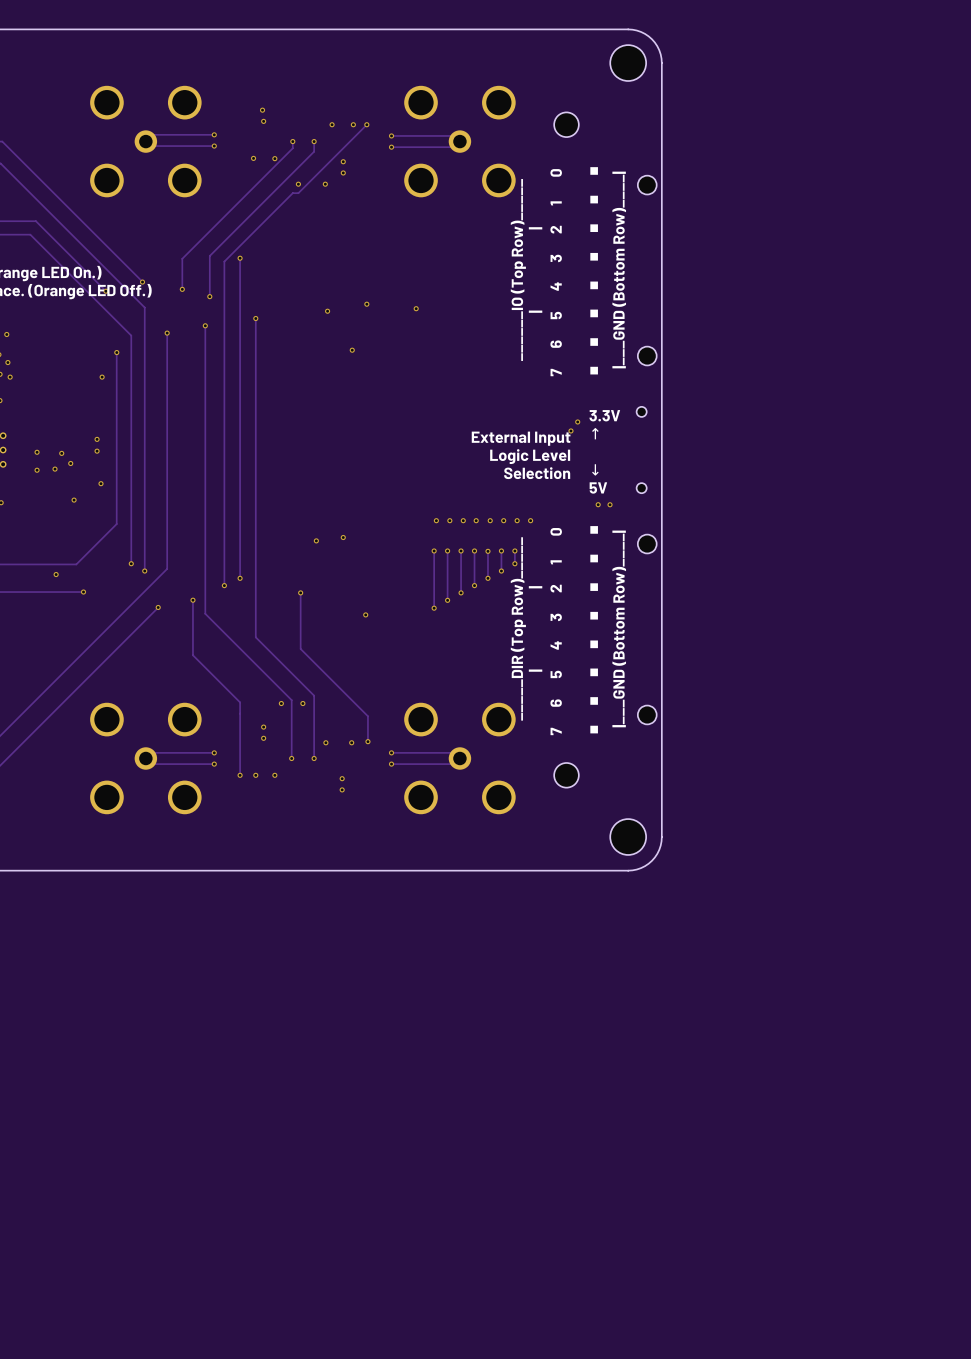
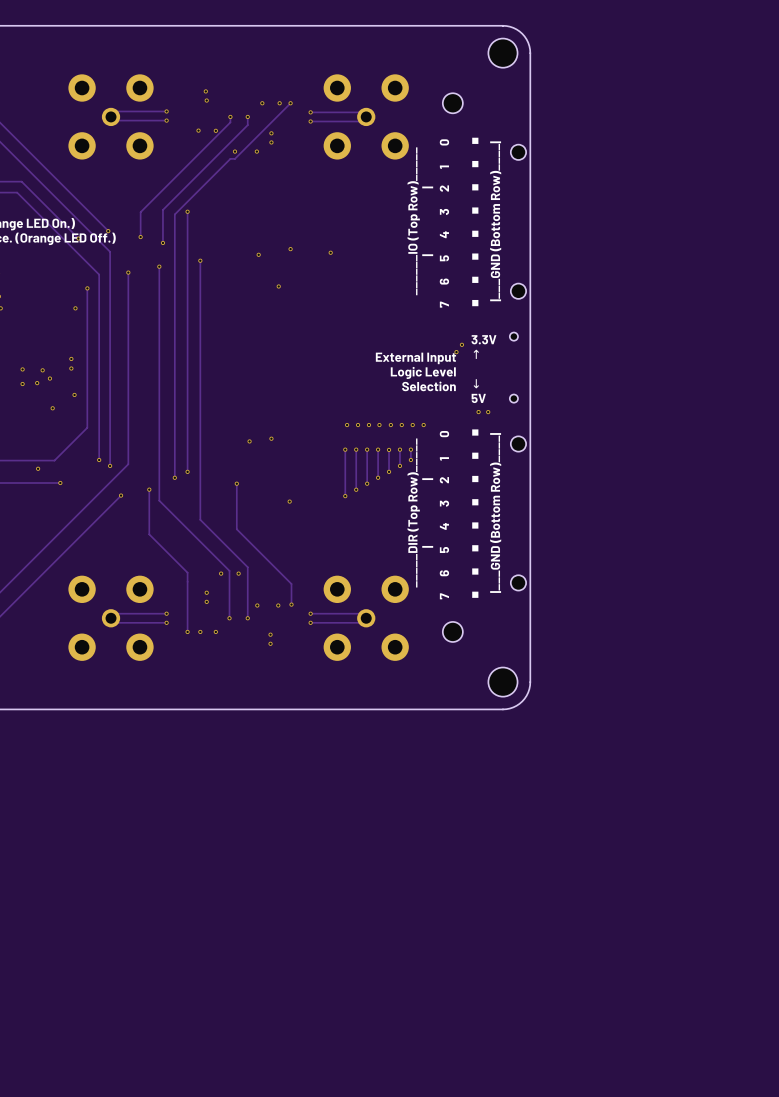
part footprint: [90, 85, 202, 198] -> [68, 74, 154, 160]
part footprint: [404, 85, 516, 198] -> [323, 74, 409, 160]
part footprint: [90, 702, 202, 815] -> [68, 575, 154, 661]
part footprint: [404, 702, 516, 815] -> [323, 575, 409, 661]

